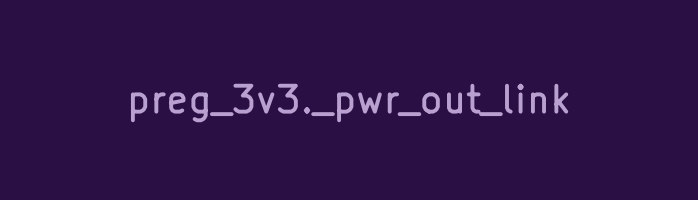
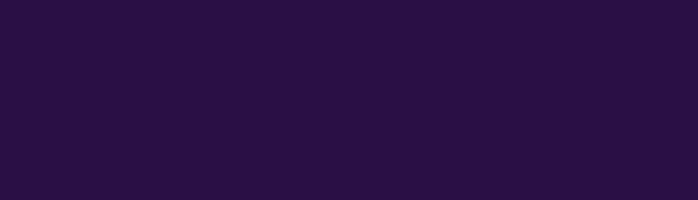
part: preg_3v3._pwr_out_link (349, 103) -> none

